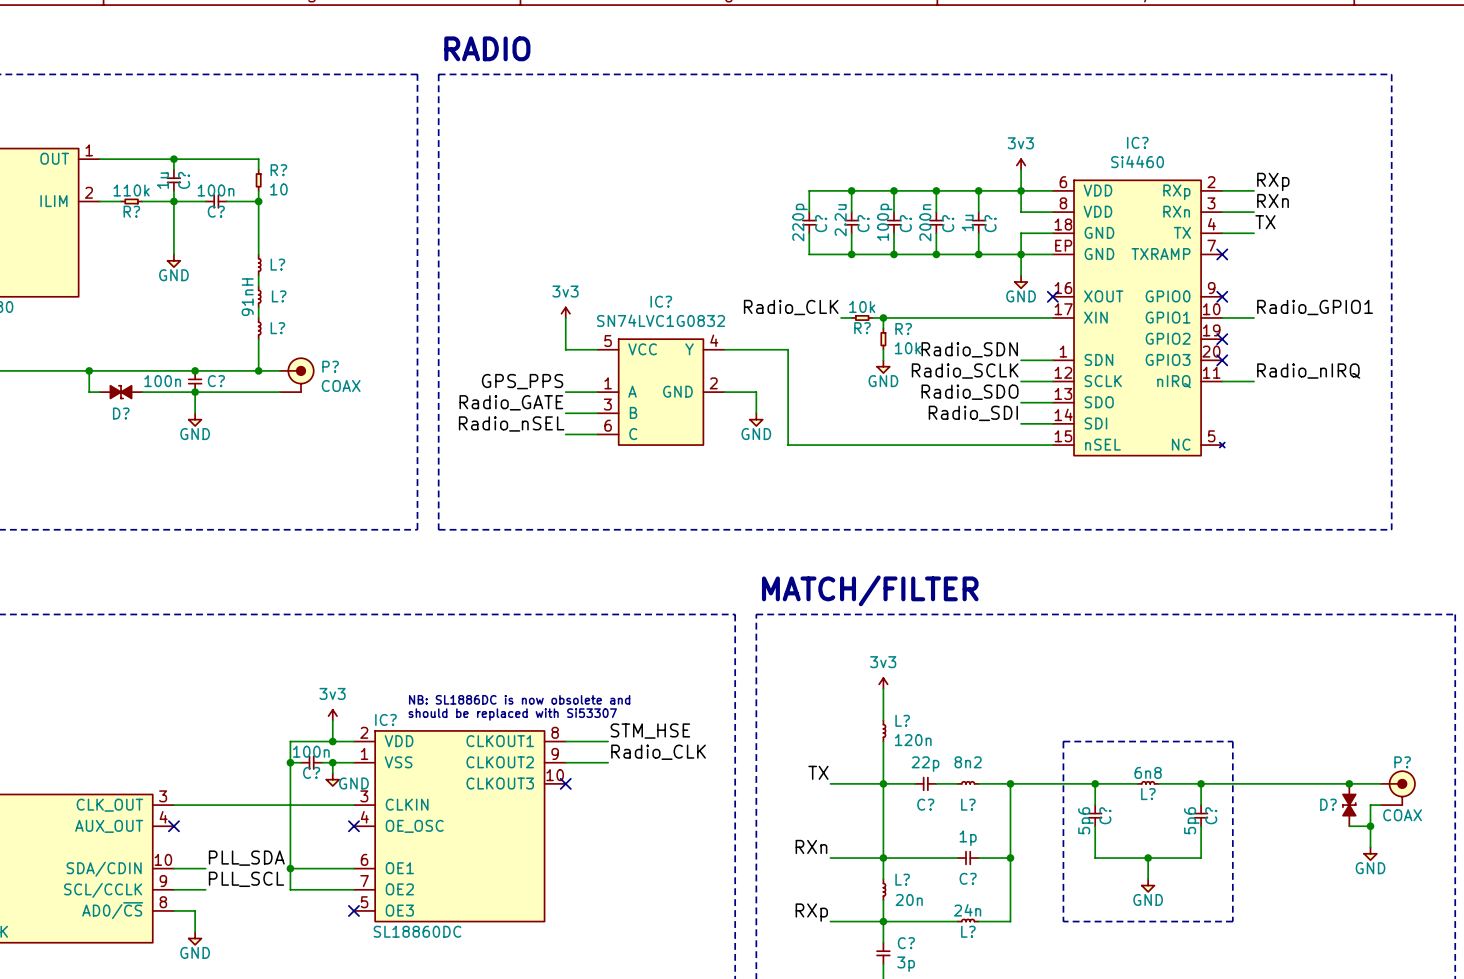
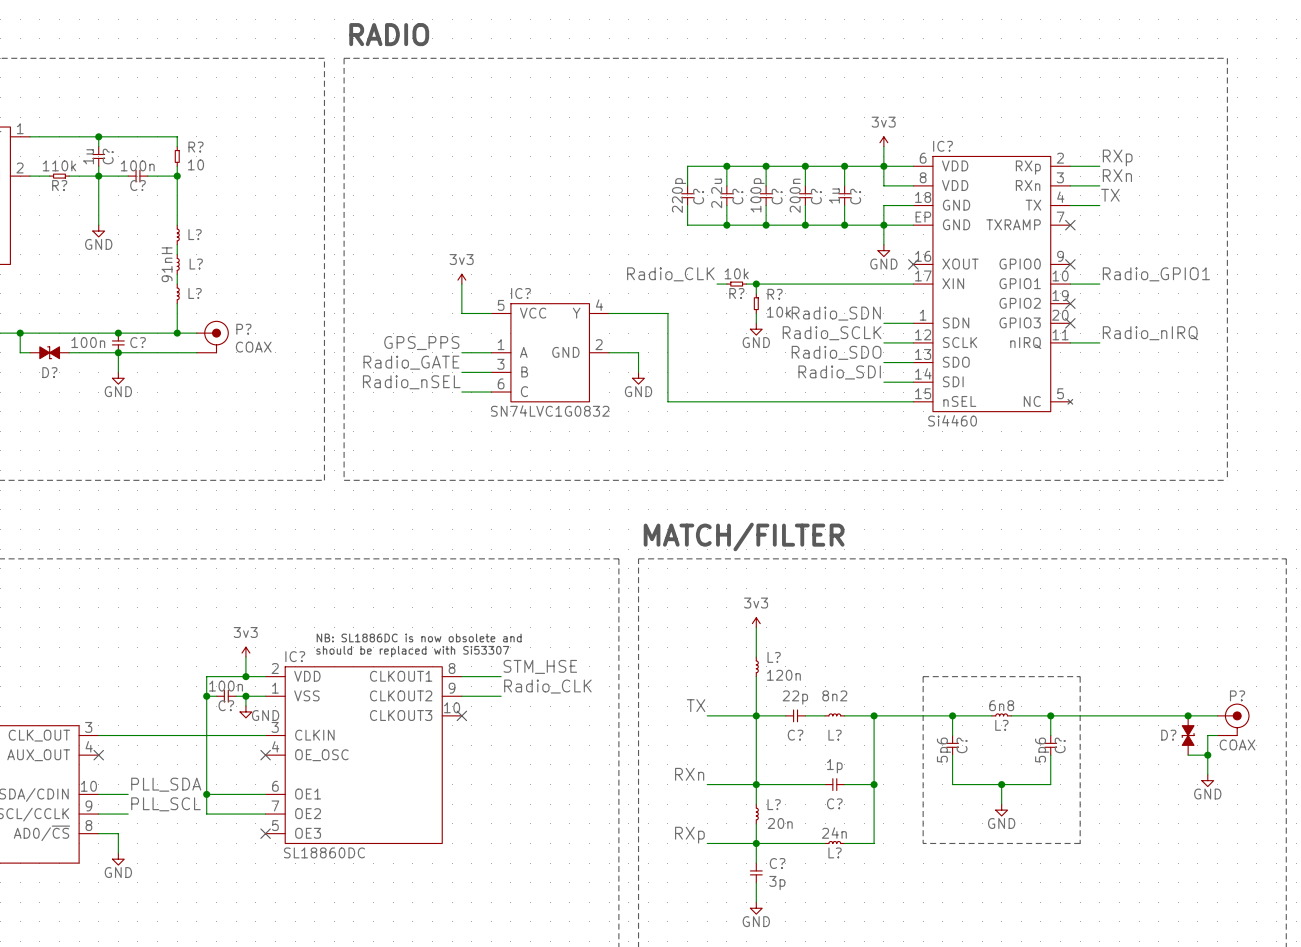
IC? name position: IC? (1137, 142) -> IC? (943, 146)
IC? value position: Si4460 (1137, 161) -> Si4460 (952, 420)
IC? name position: IC? (661, 301) -> IC? (520, 293)
IC? value position: SN74LVC1G0832 (661, 320) -> SN74LVC1G0832 (550, 411)

